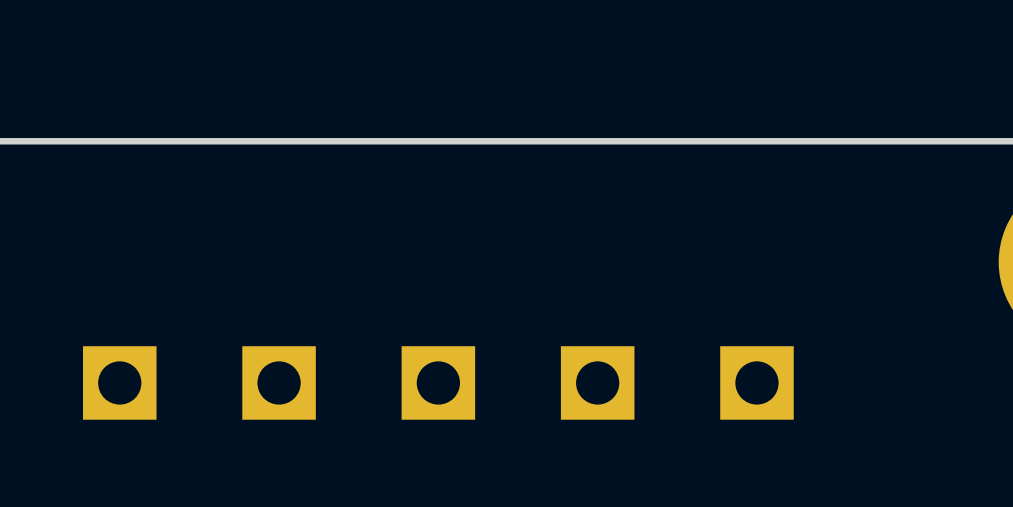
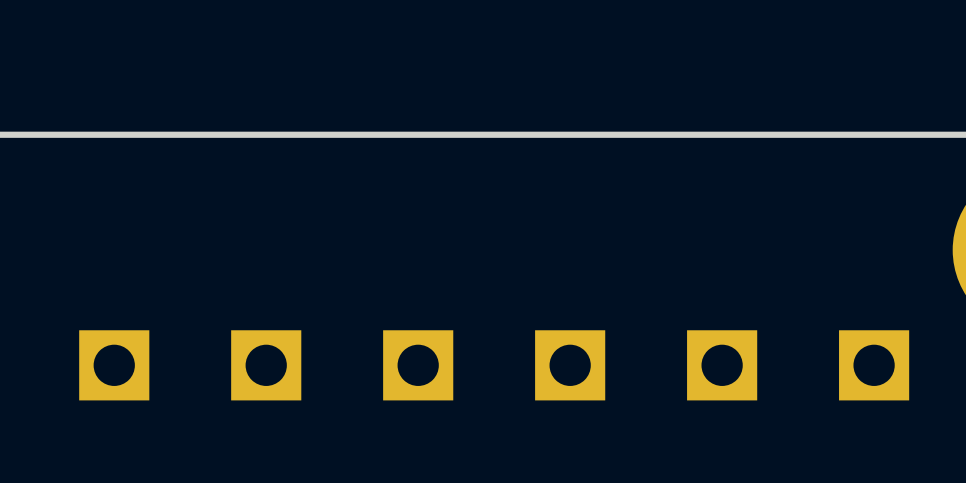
part: none -> (874, 365)

